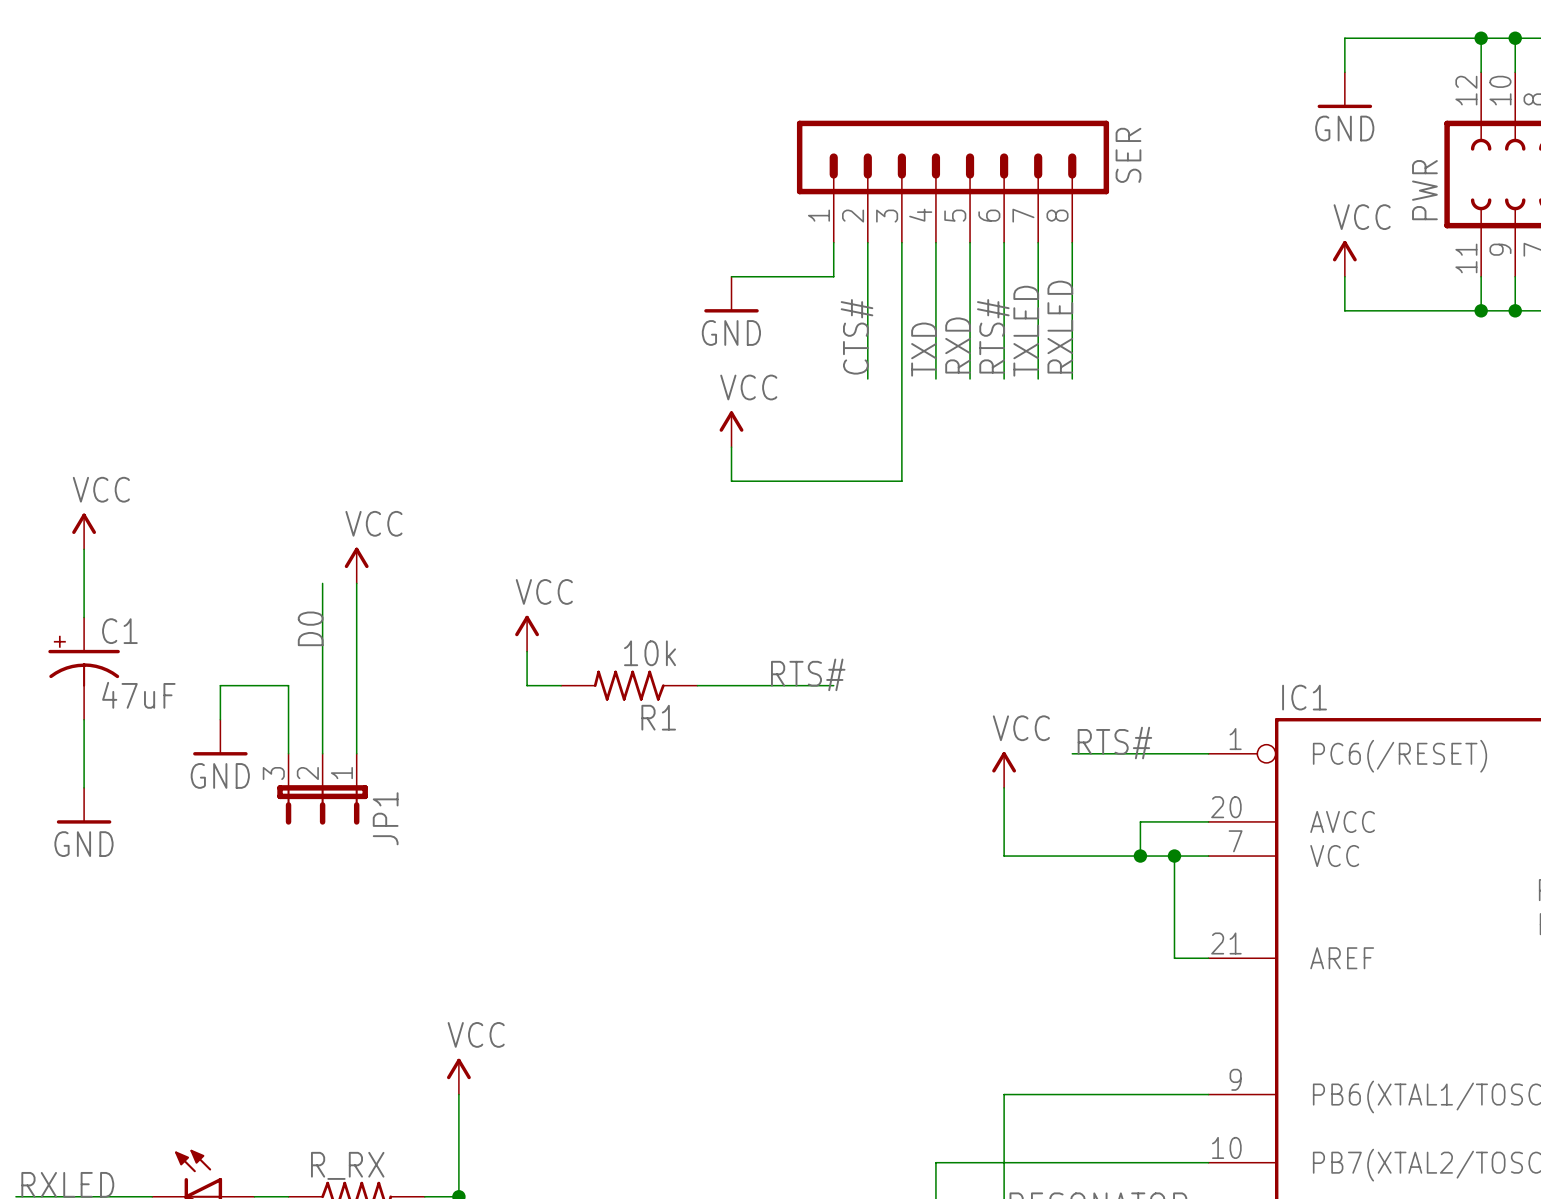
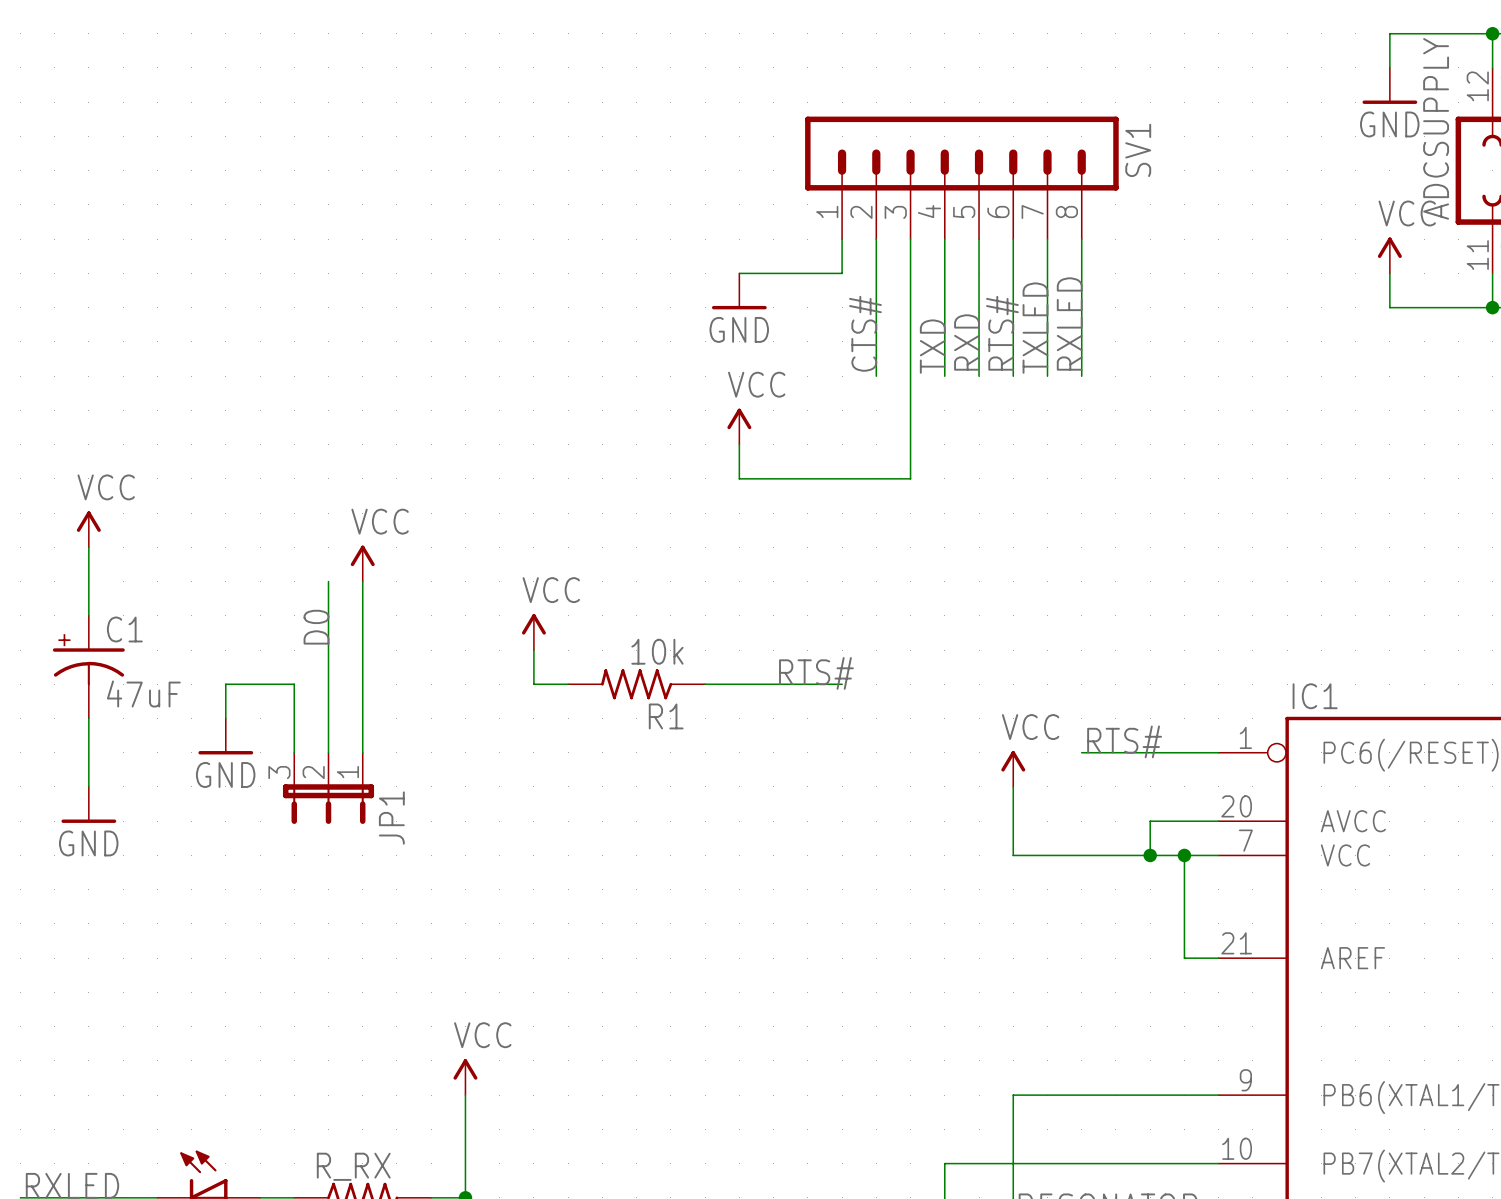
wire: (1378, 38) (1344, 38) (1344, 72) -> (1389, 33) (1389, 67)
power symbol position: GND (1344, 90) -> GND (1389, 85)
SER name: SER (1128, 155) -> SV1 (1138, 150)
PWR name: PWR (1424, 190) -> ADCSUPPLY (1436, 128)
power symbol position: VCC (1344, 258) -> VCC (1389, 255)
wire: (1344, 276) (1344, 310) (1378, 310) -> (1389, 273) (1389, 307)

